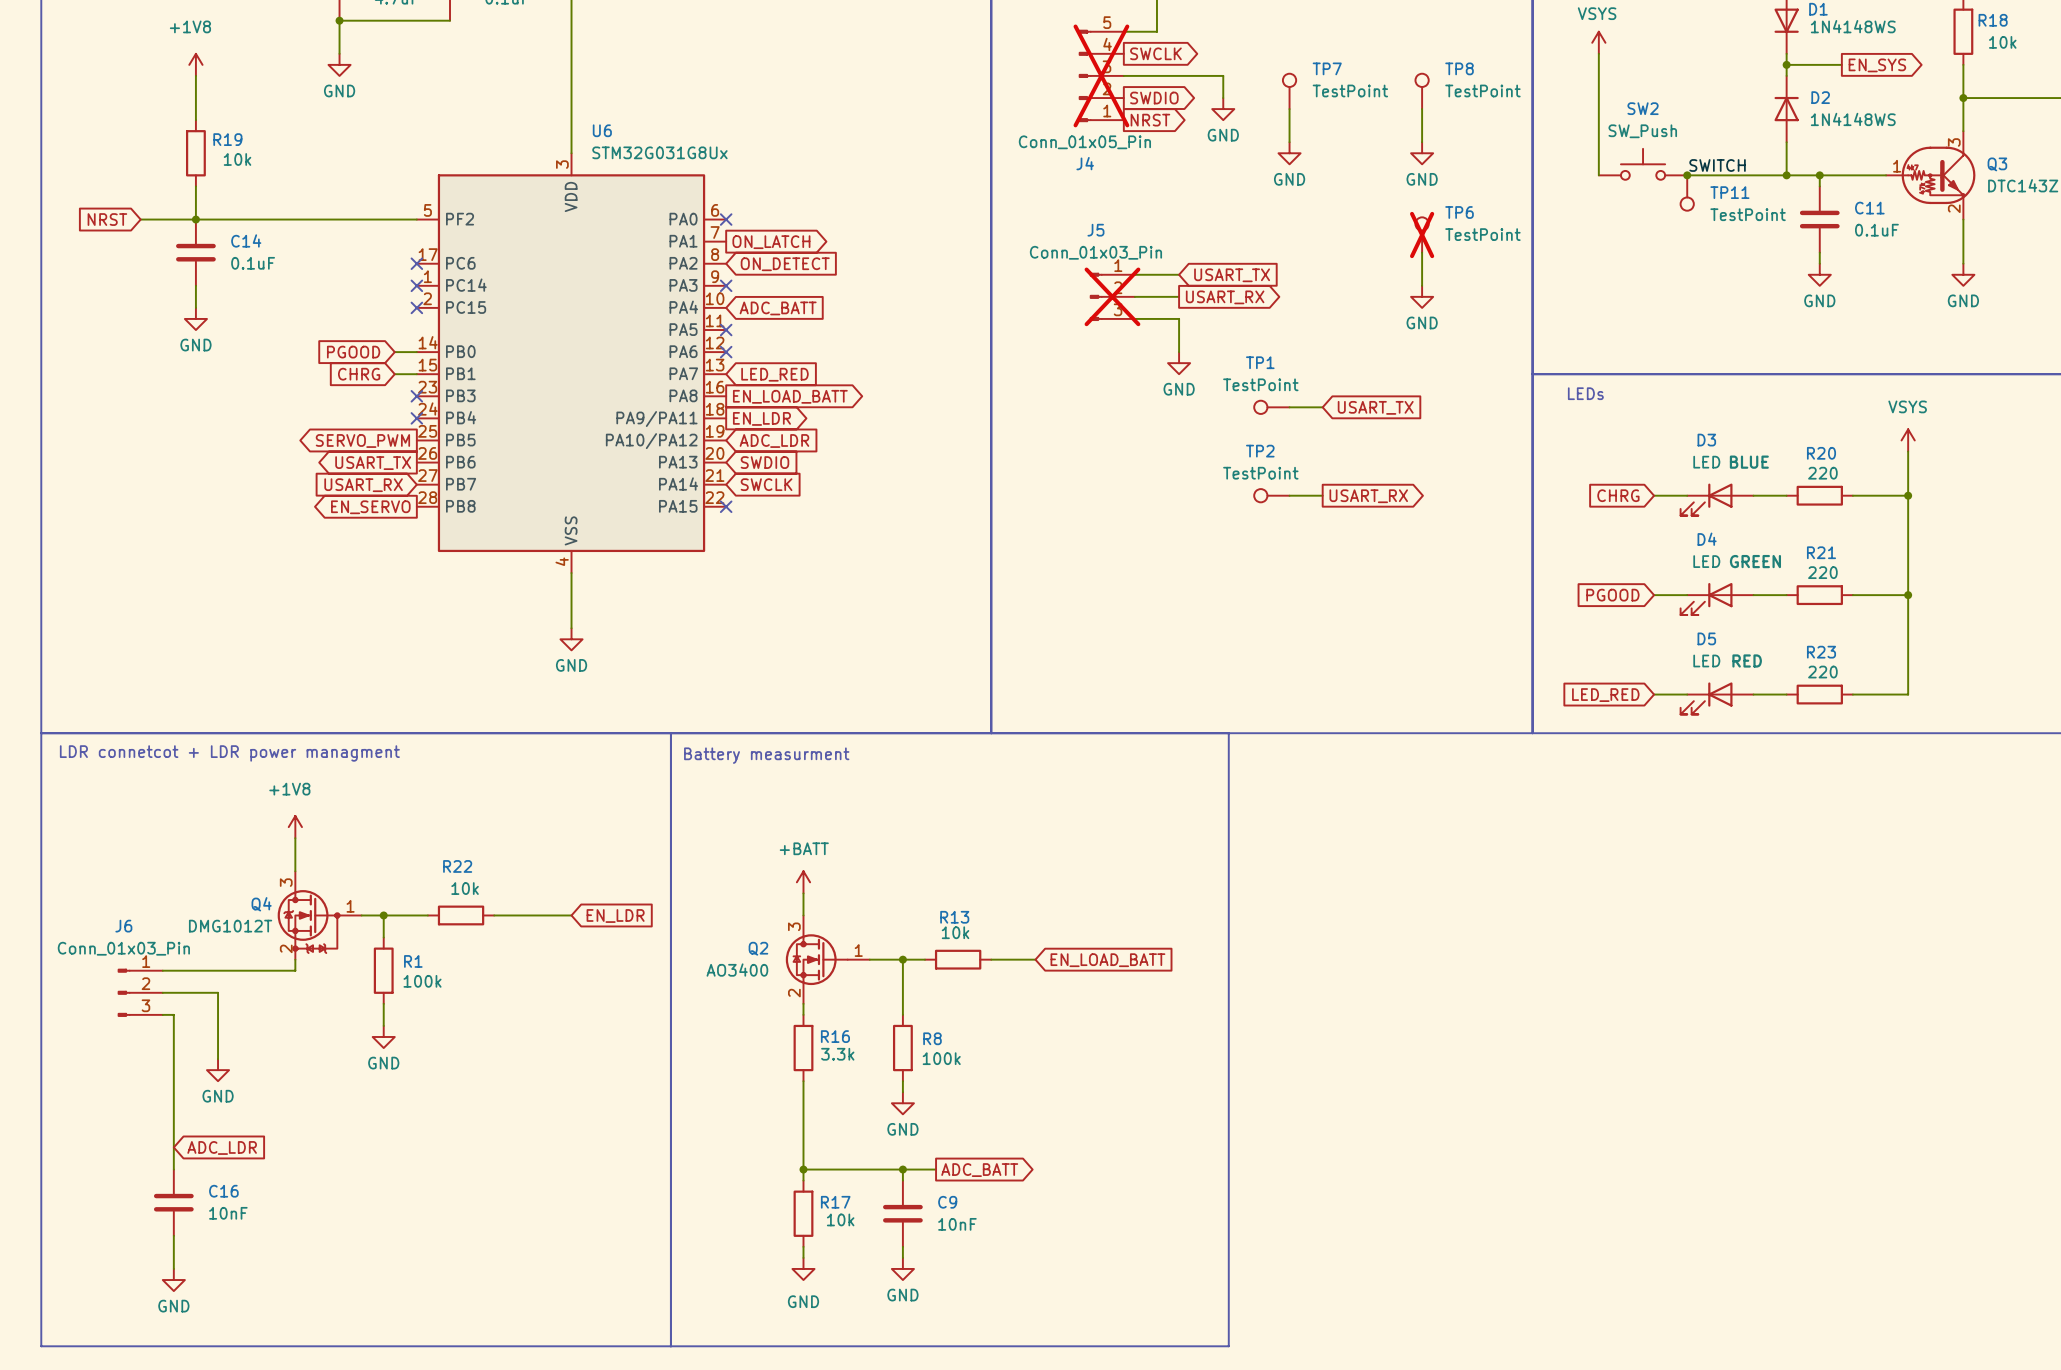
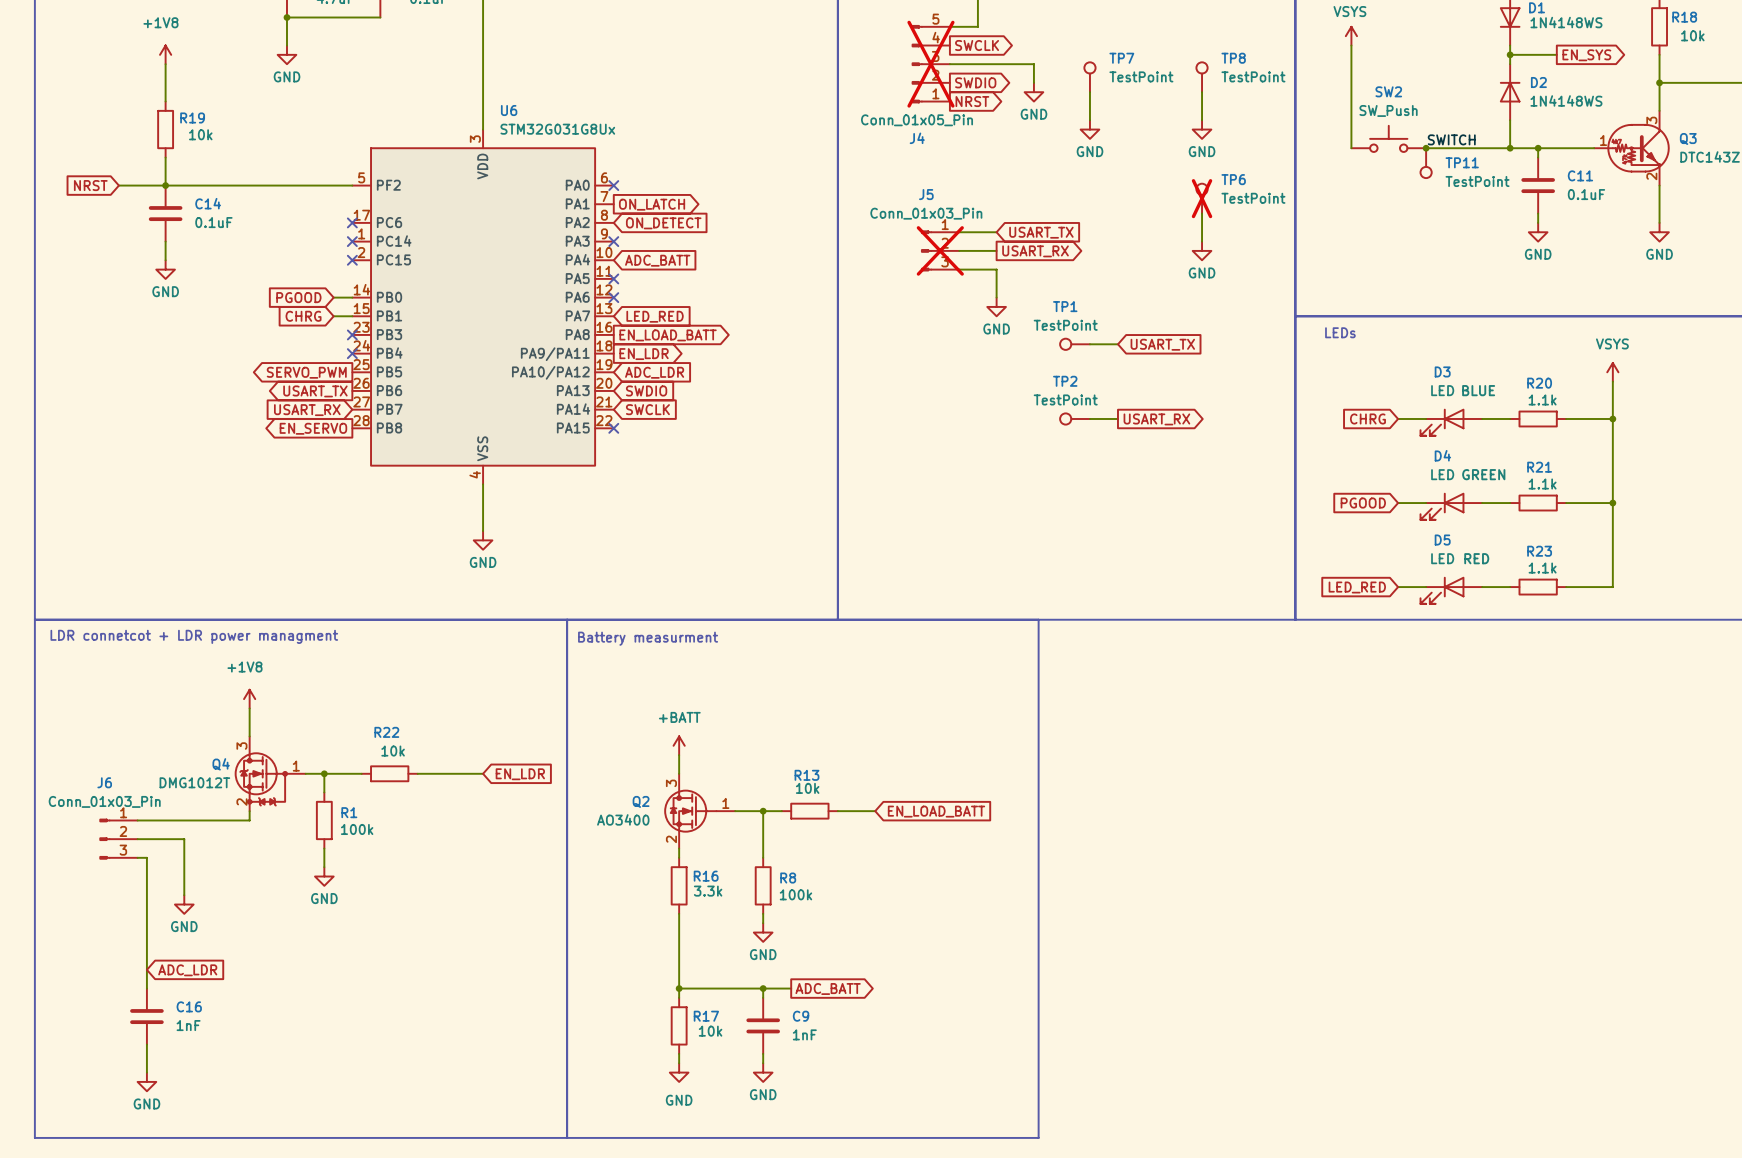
R20 value: 220 (1822, 473) -> 1.1k (1542, 399)
R21 value: 220 (1822, 572) -> 1.1k (1542, 484)
R23 value: 220 (1822, 672) -> 1.1k (1542, 568)
C16 value: 10nF (228, 1213) -> 1nF (188, 1025)
C9 value: 10nF (957, 1224) -> 1nF (804, 1034)

